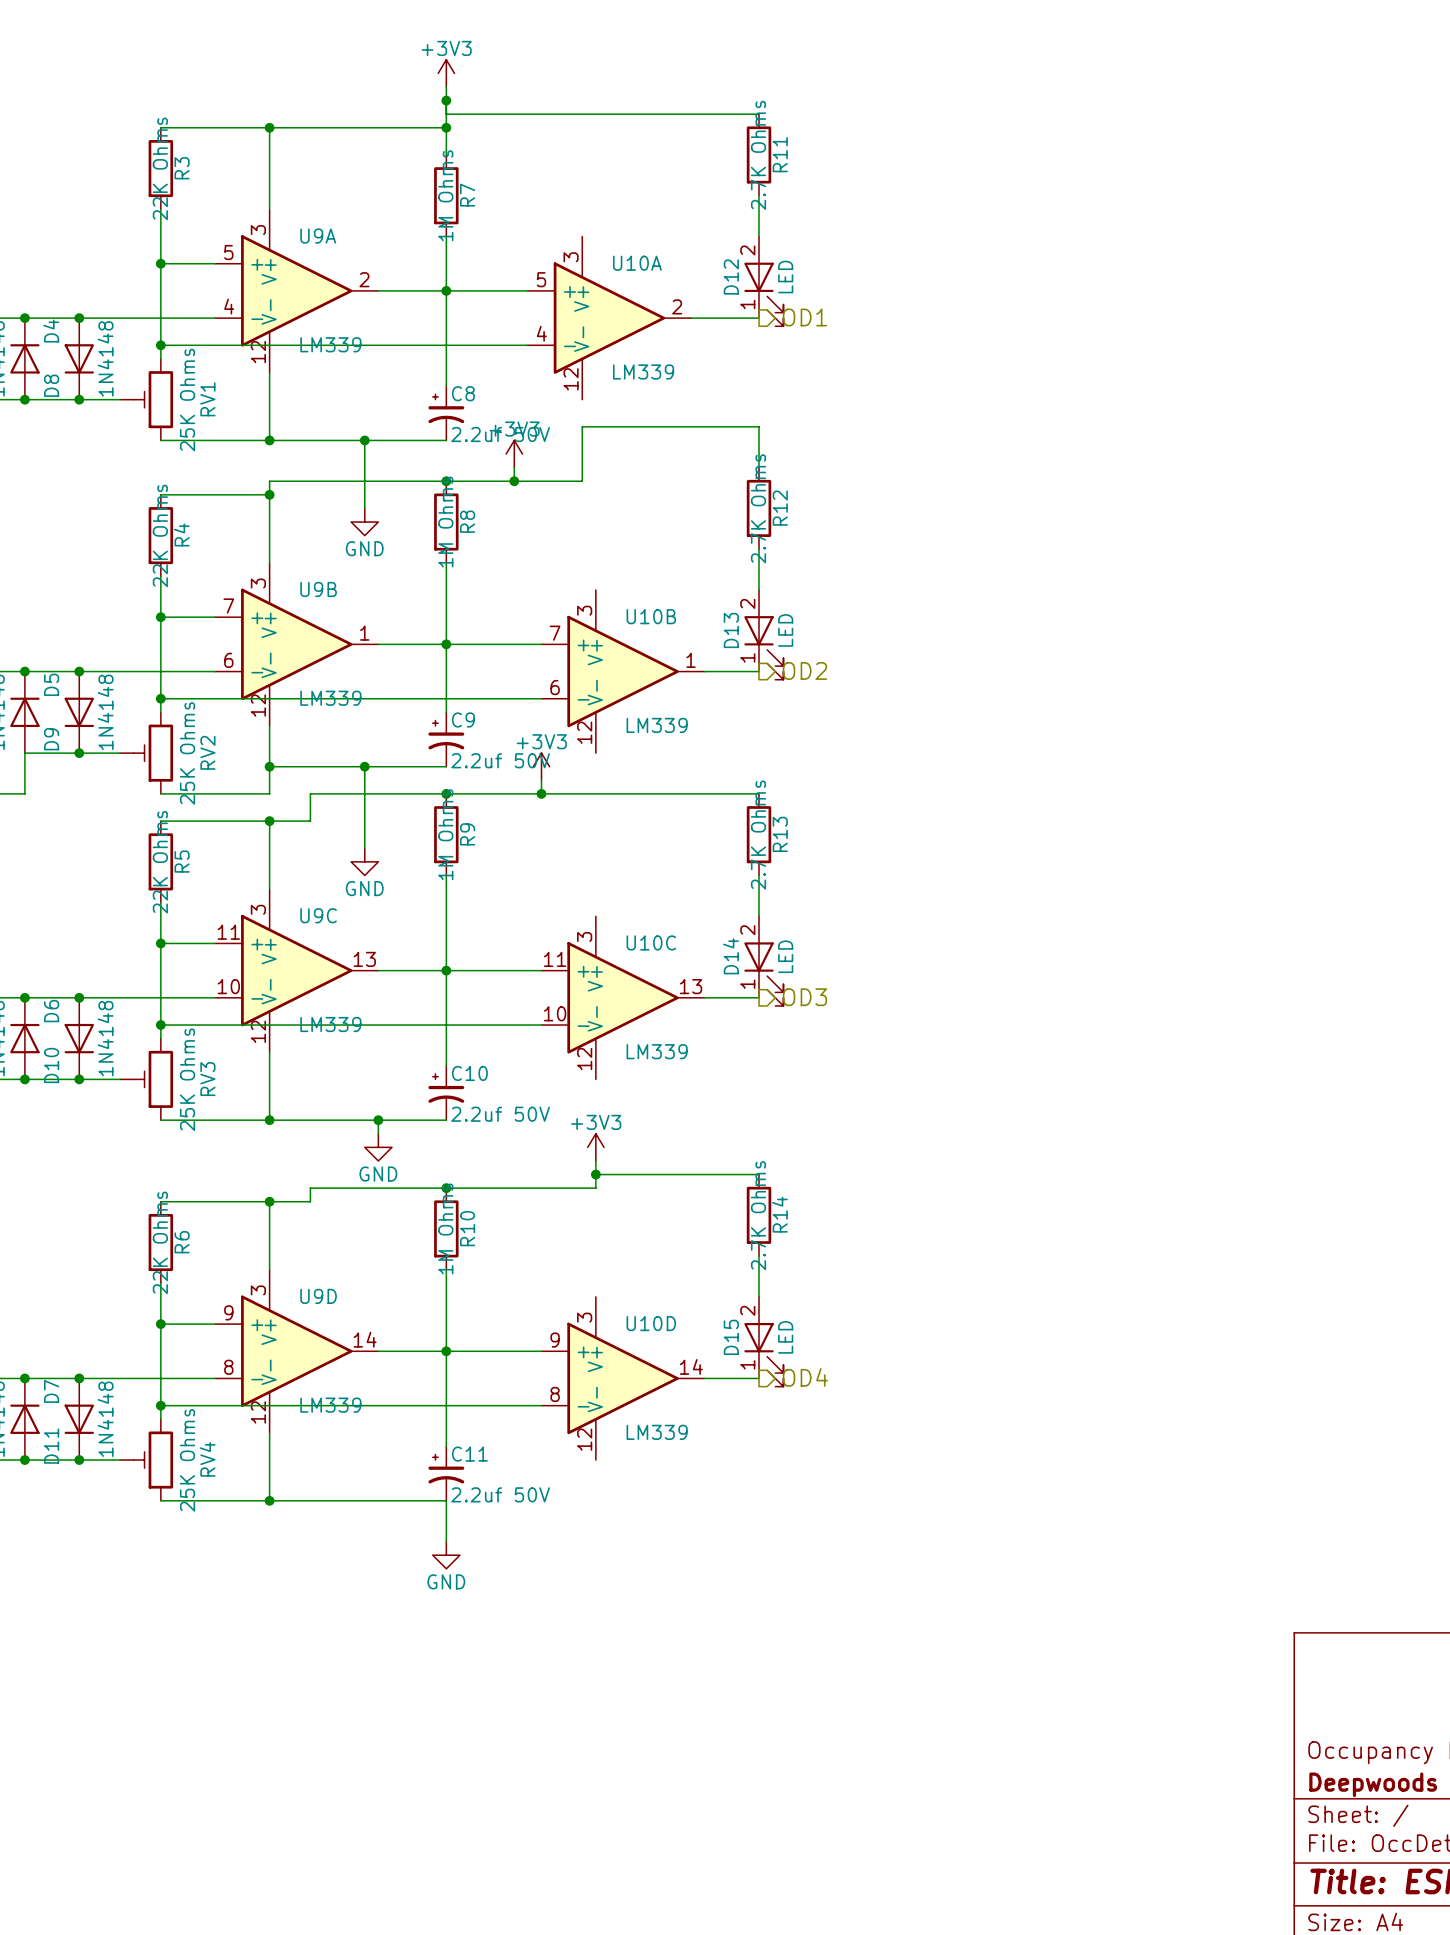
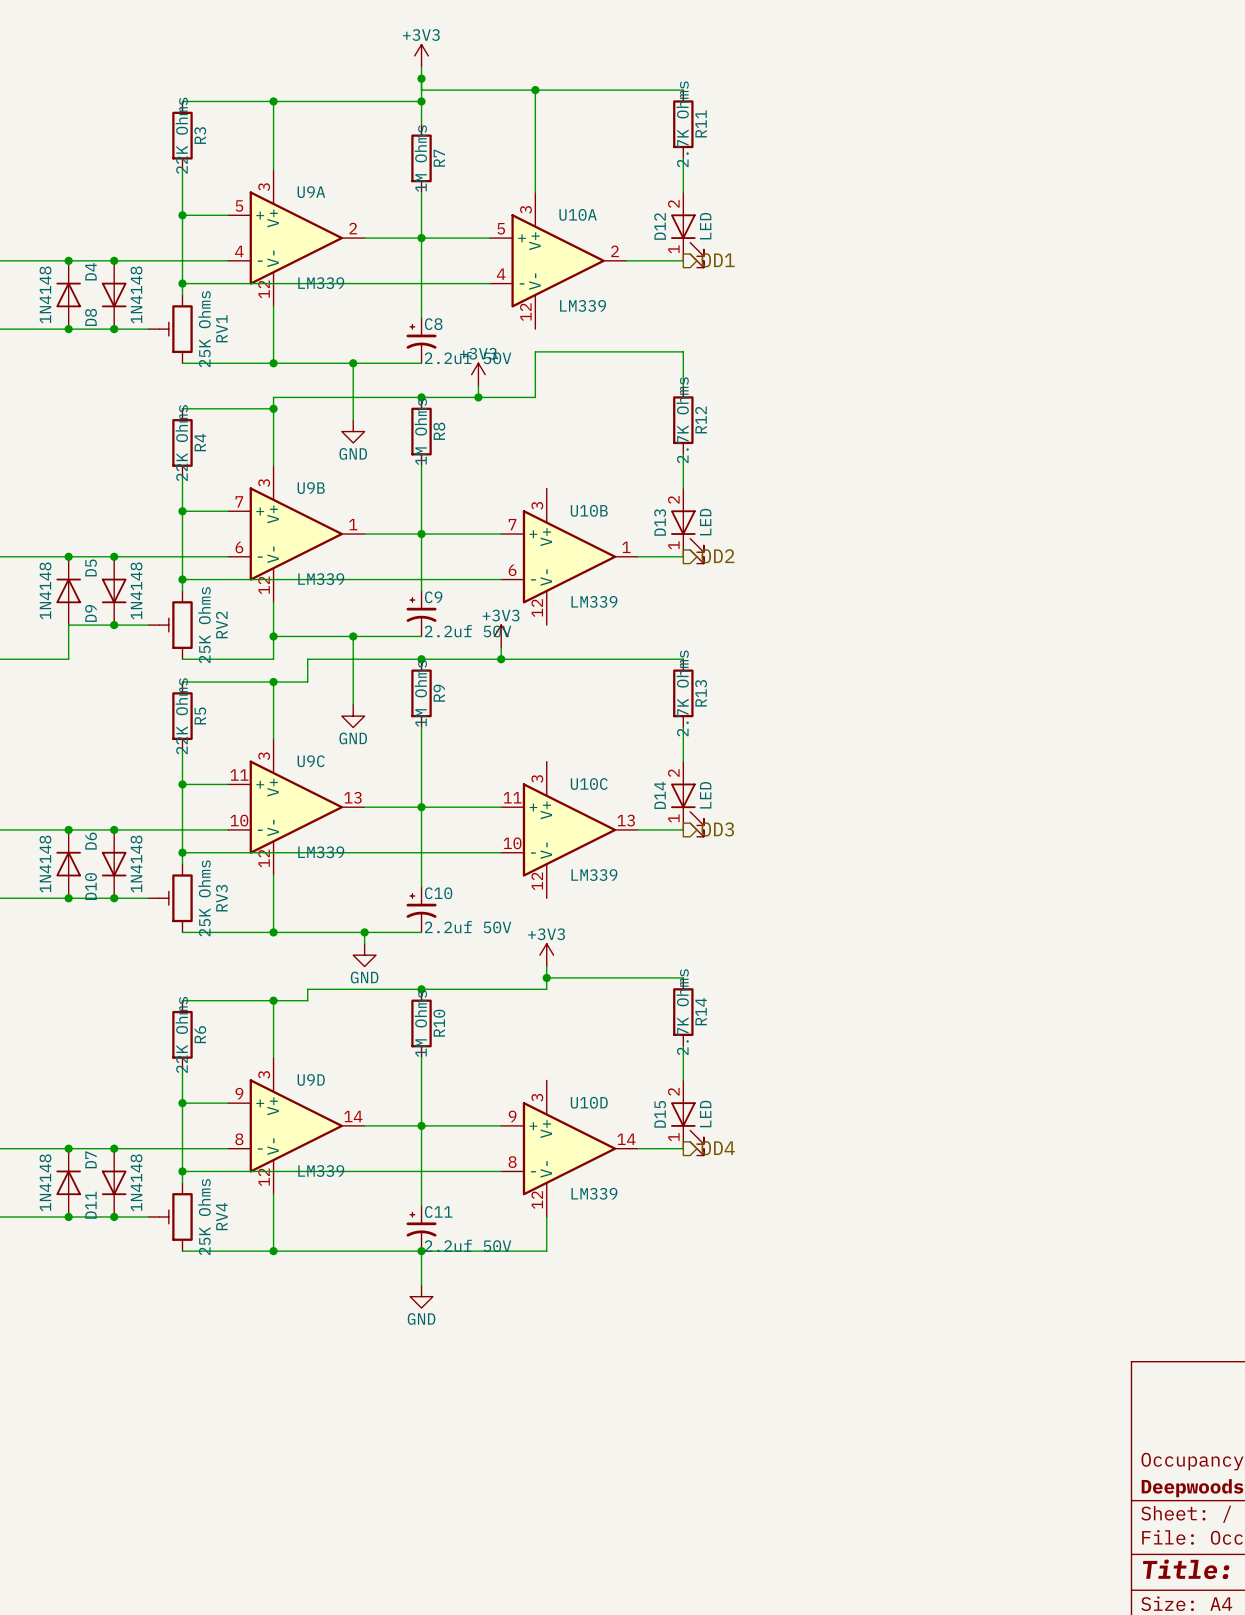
wire: none -> (535, 90) (535, 192)
junction: none -> (535, 90)
wire: none -> (546, 1216) (546, 1251) (421, 1251)
junction: none -> (421, 1251)

